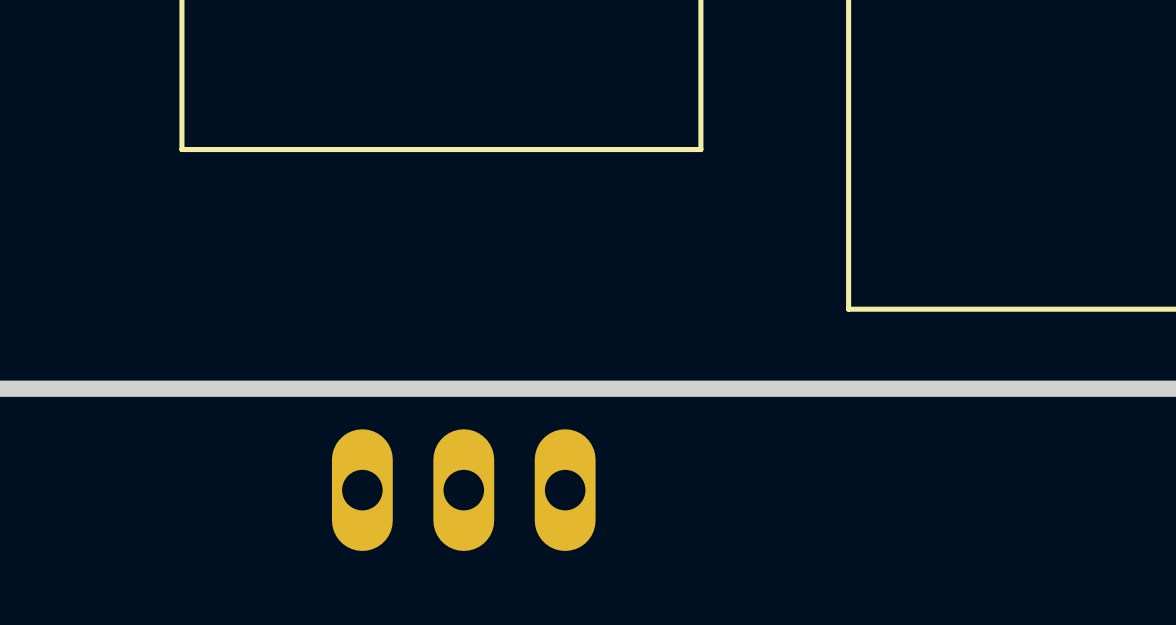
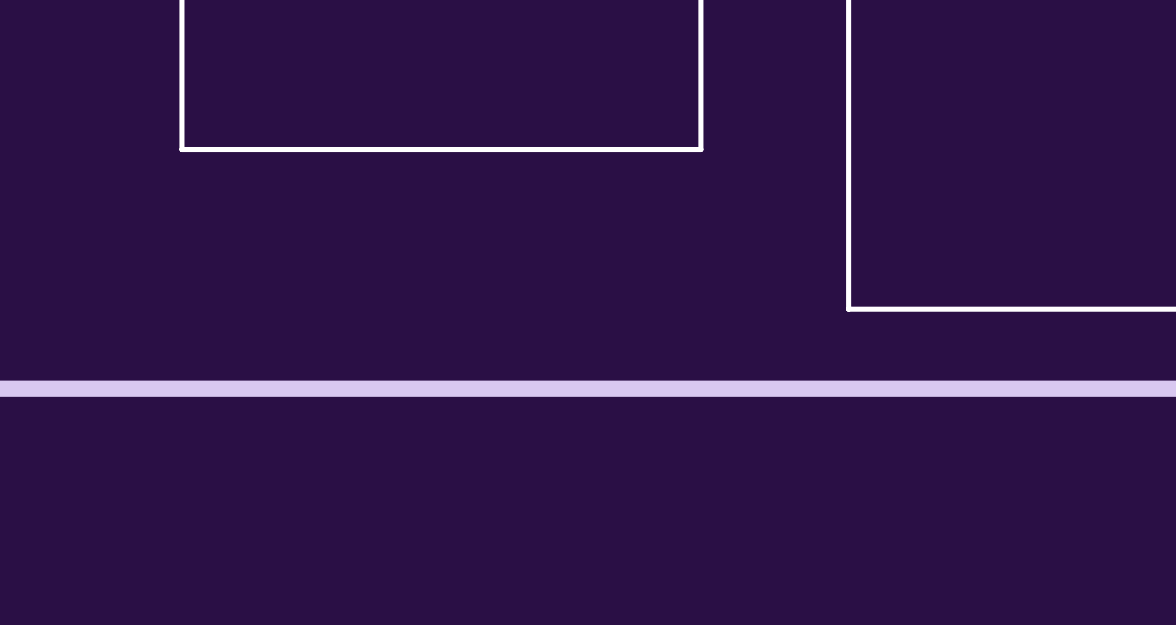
part: (463, 490) -> none

